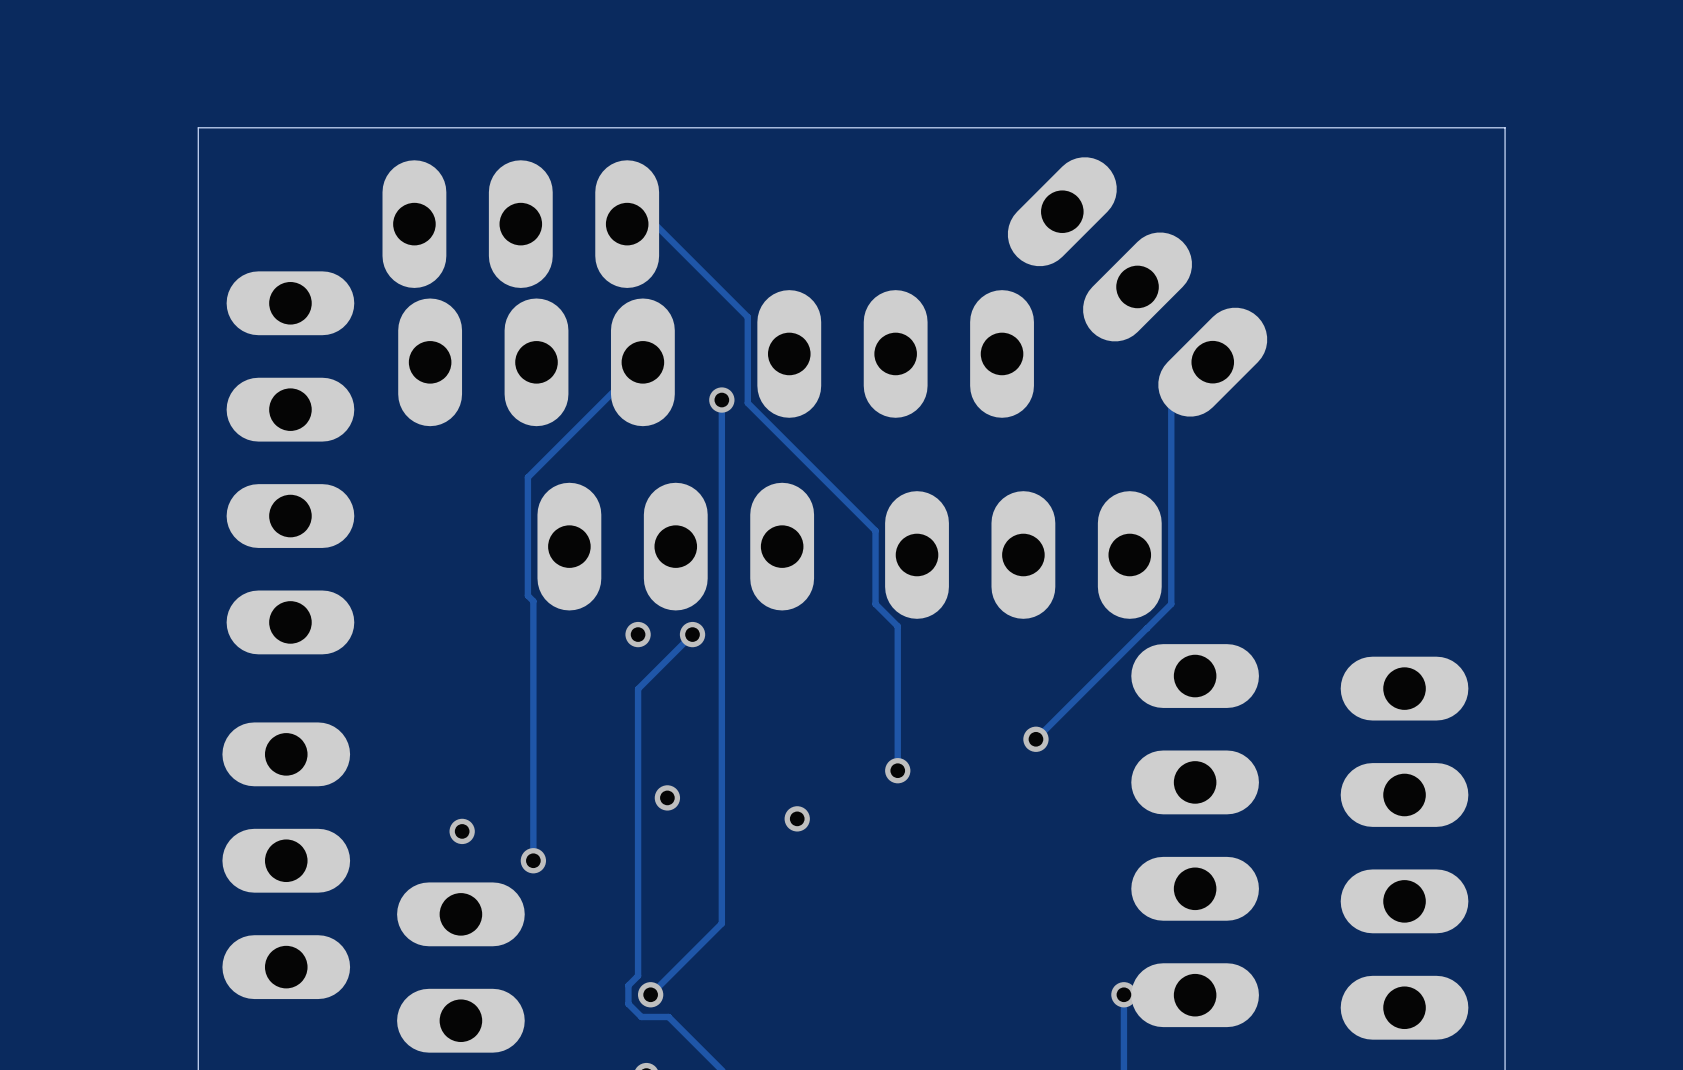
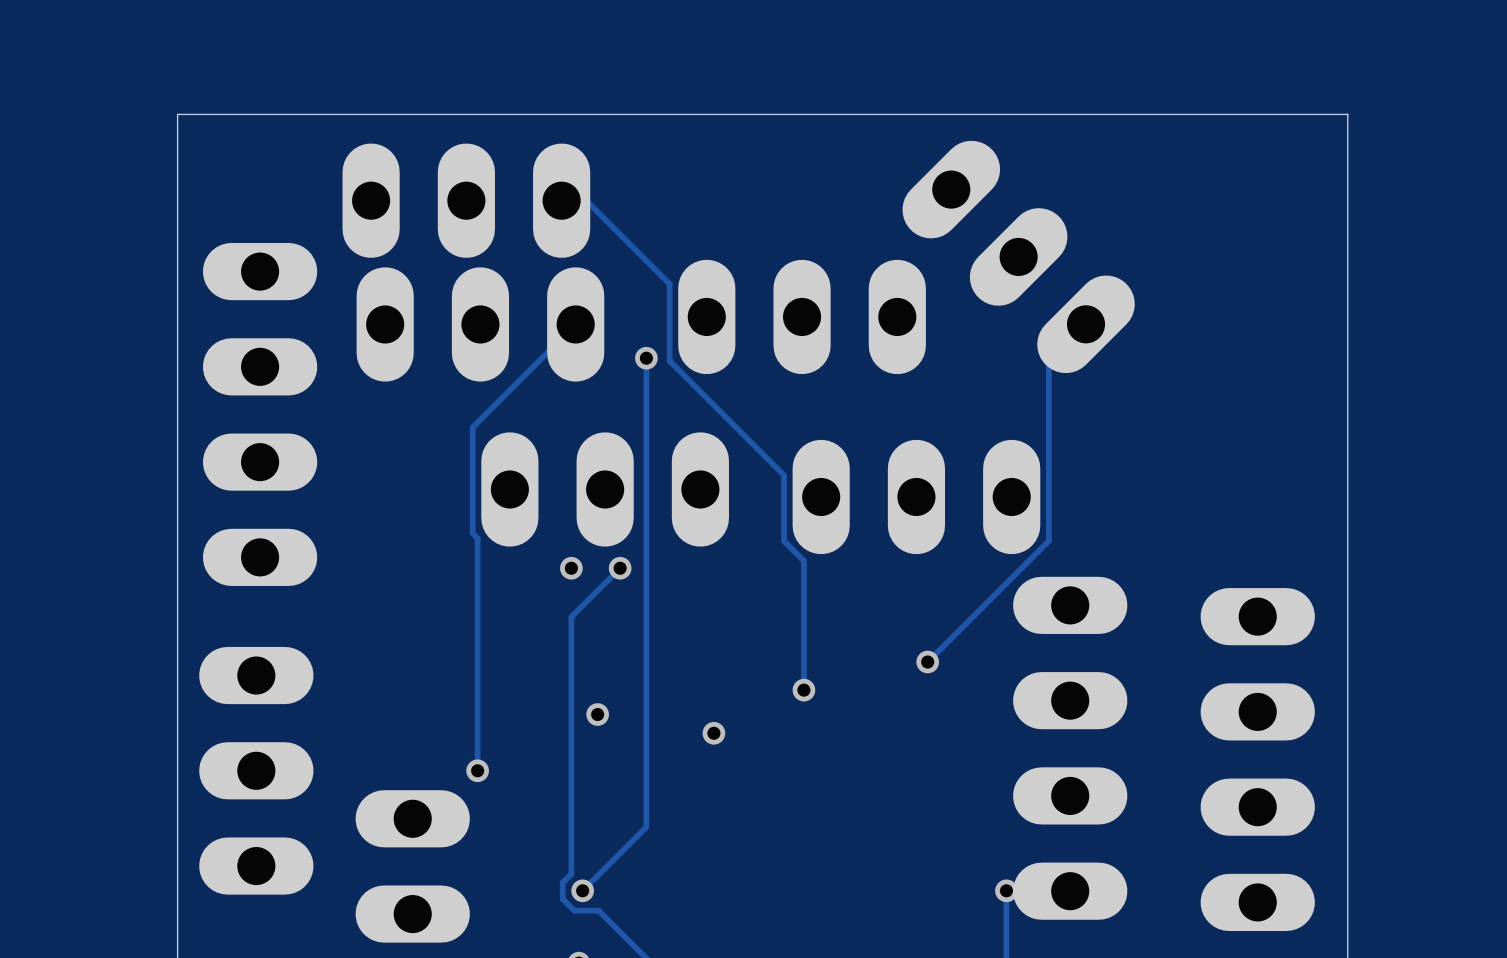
via: (462, 831) -> none

